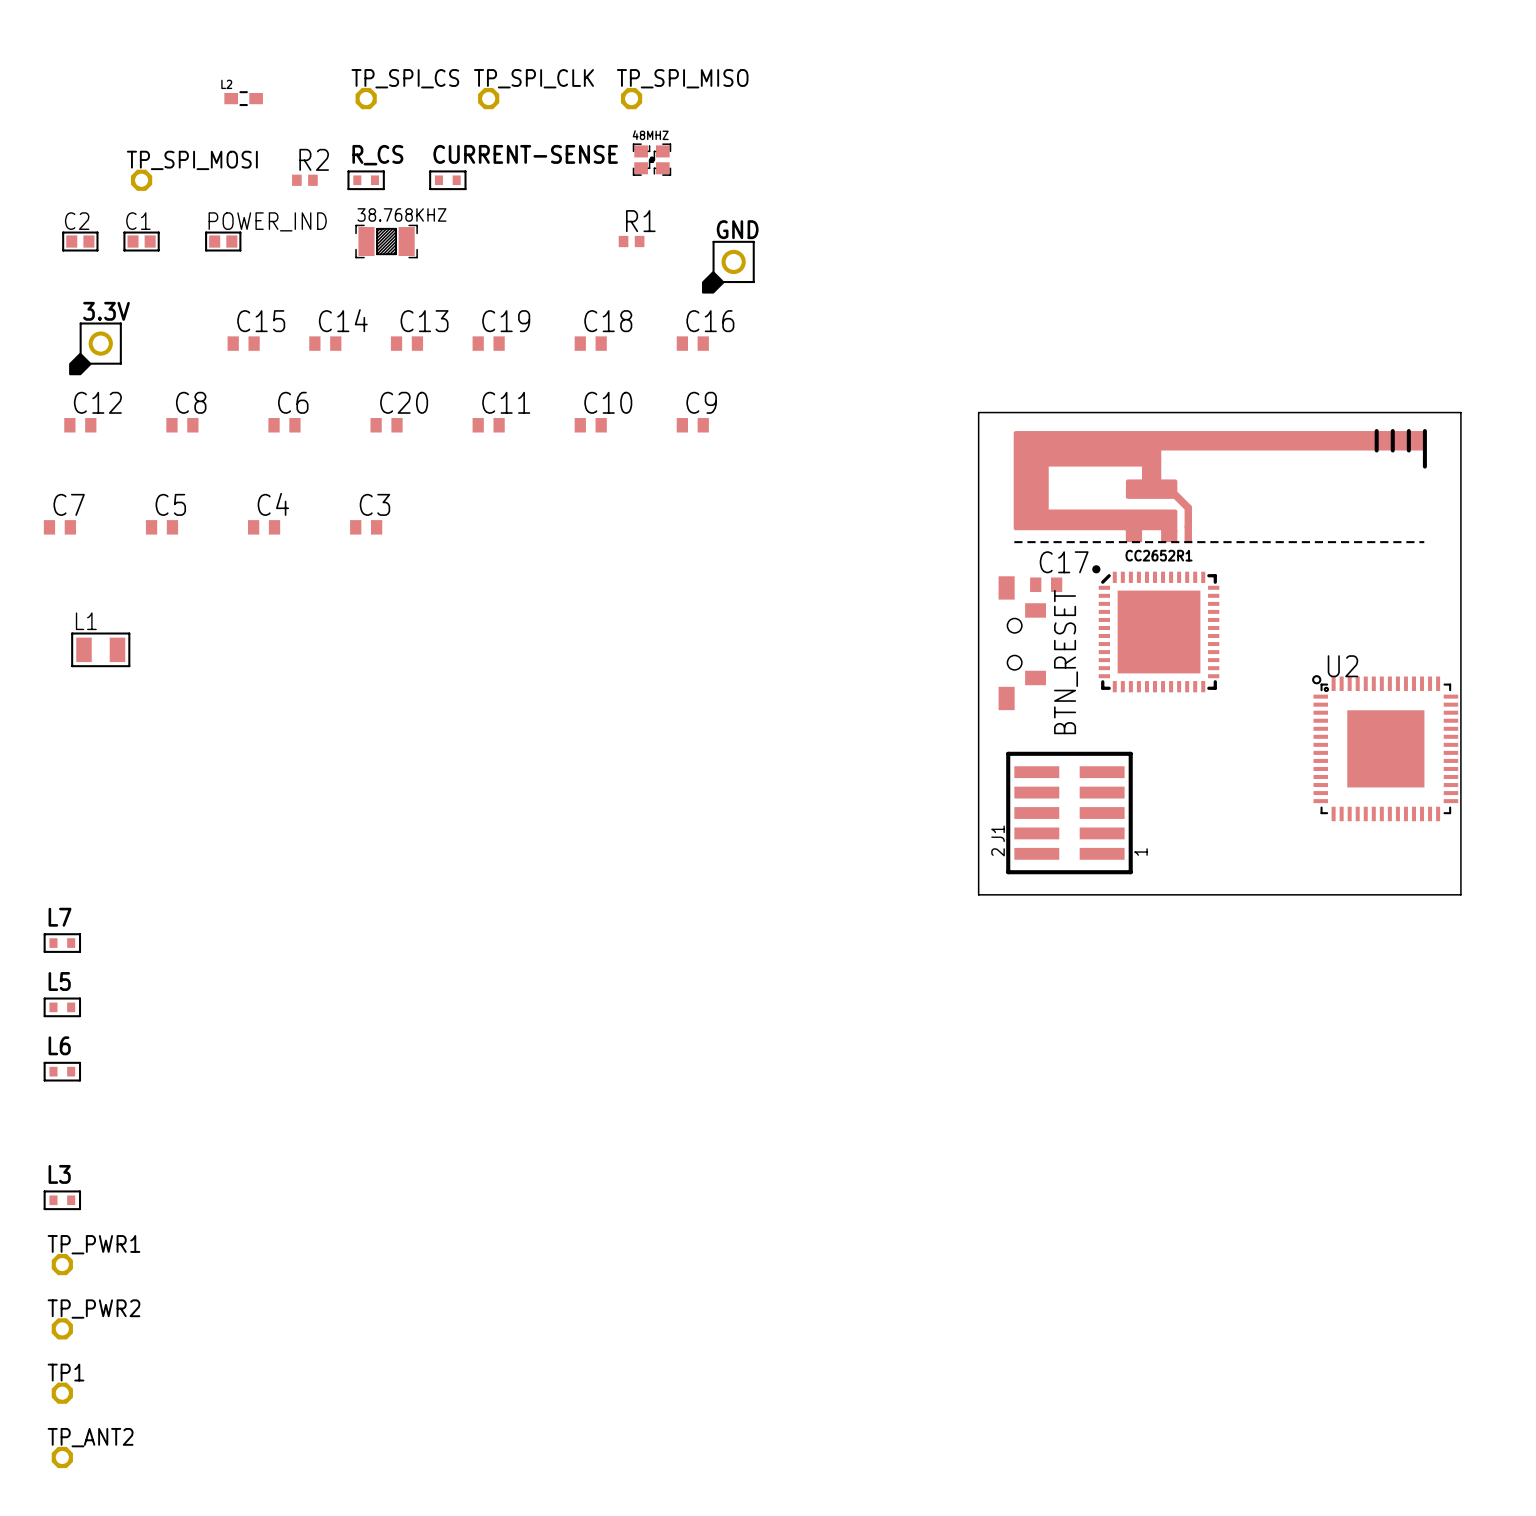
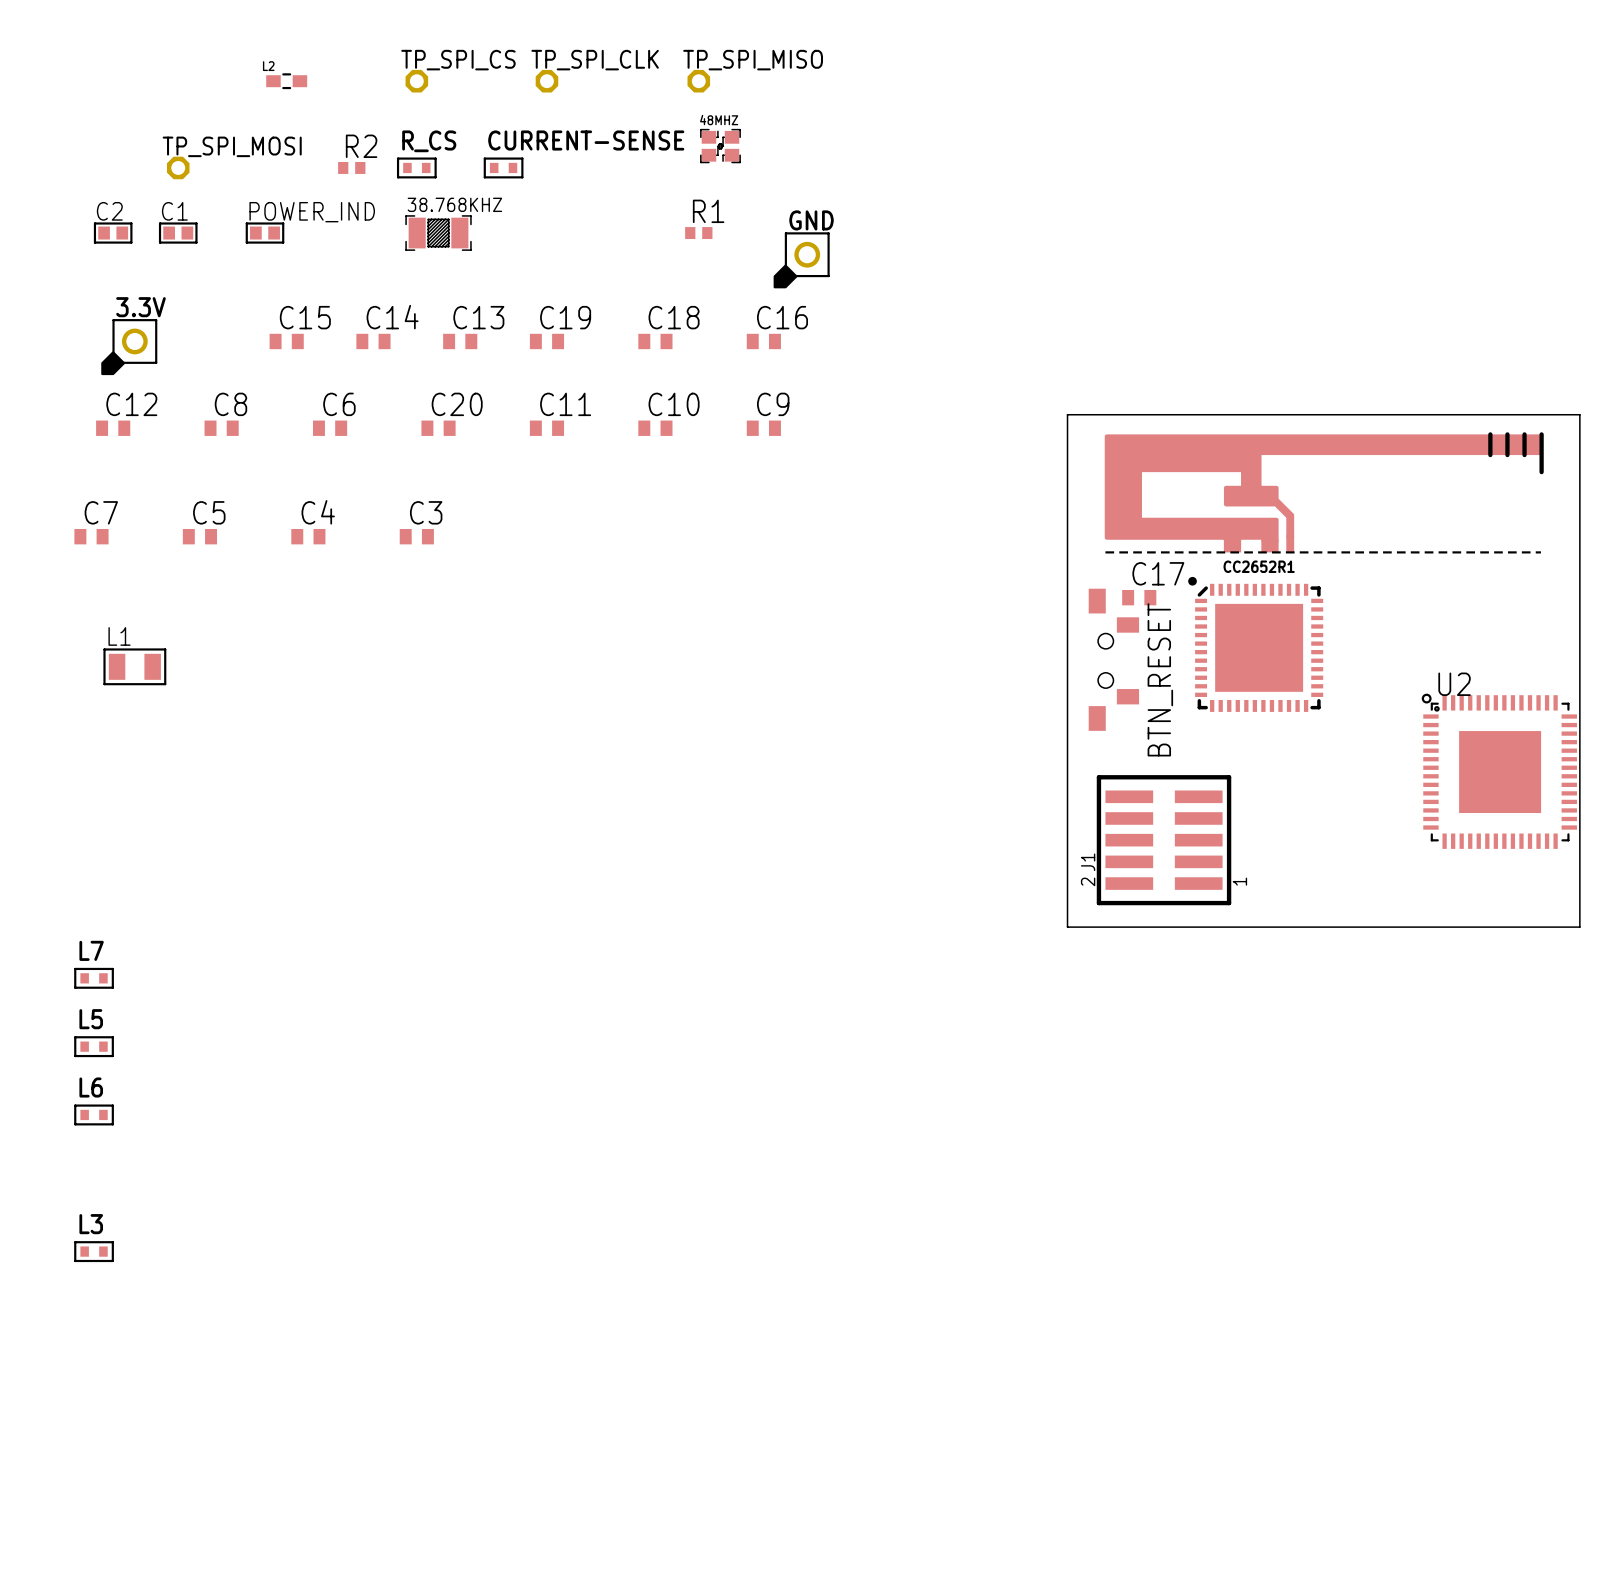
TP_PWR1: (62, 1264) -> none
TP_PWR2: (62, 1328) -> none
TP1: (62, 1393) -> none
TP_ANT2: (62, 1457) -> none

